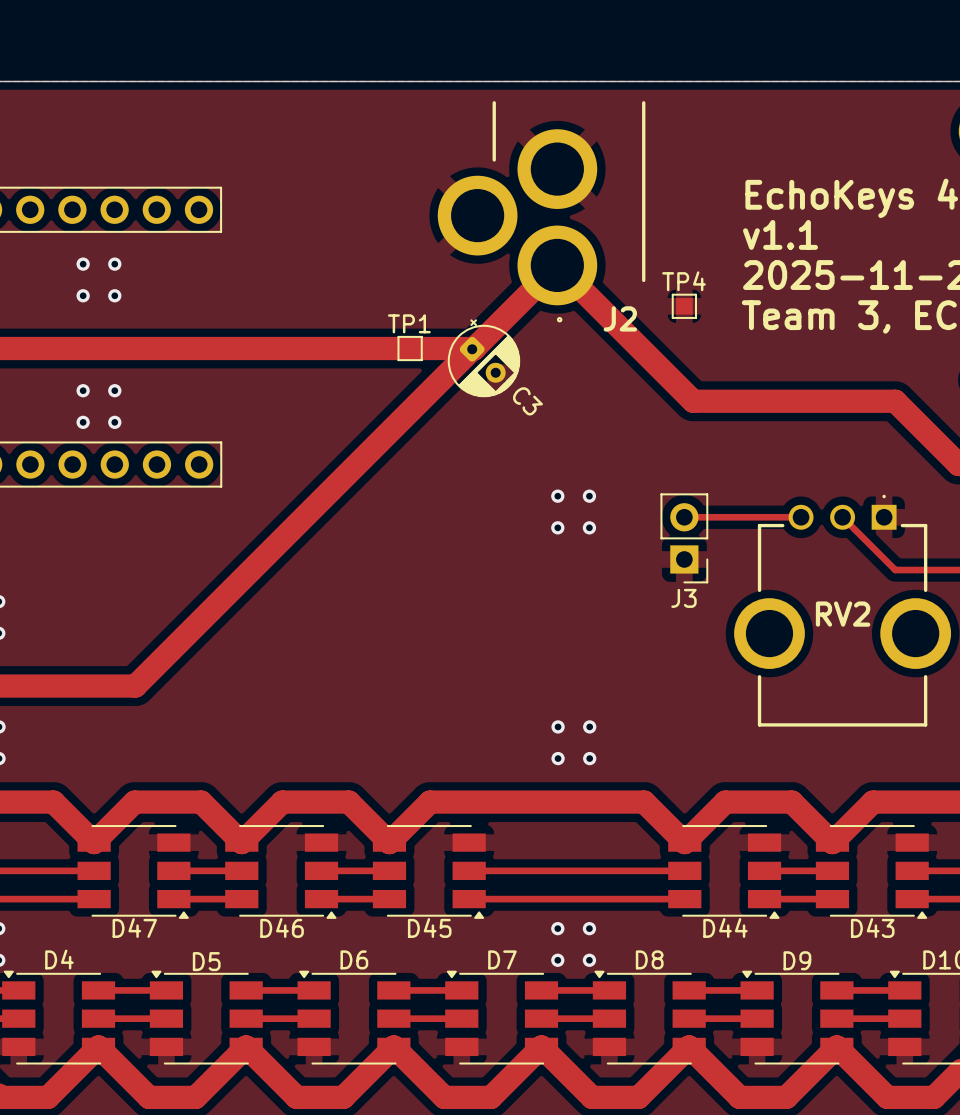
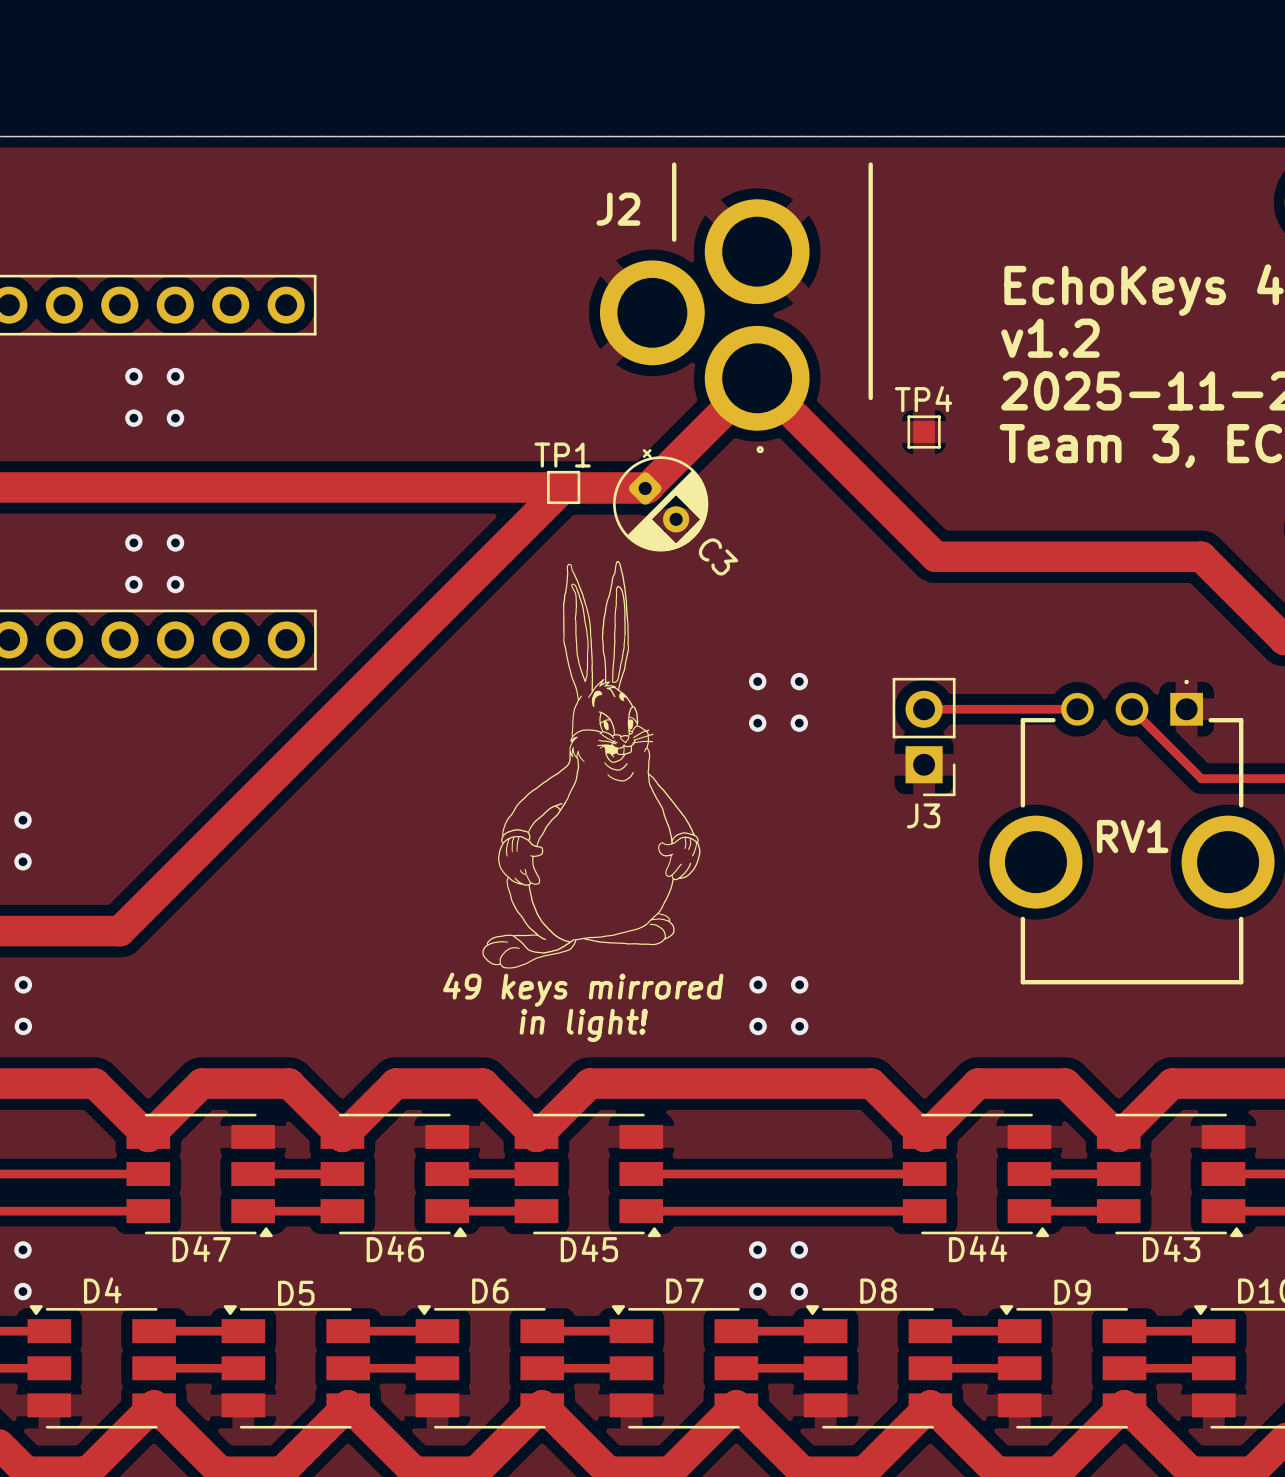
text: v1.1 (780, 234) -> v1.2 (1050, 338)
J2 name position: J2 (620, 318) -> J2 (618, 209)
track: (472, 349) (135, 686) (72, 686) -> (645, 488) (562, 488) (120, 931)
drawing: none -> [482, 560, 701, 969]
RV2 name: RV2 (843, 614) -> RV1 (1132, 836)
text: none -> 49 keys mirrored (583, 989)
text: none -> in light! (583, 1025)

